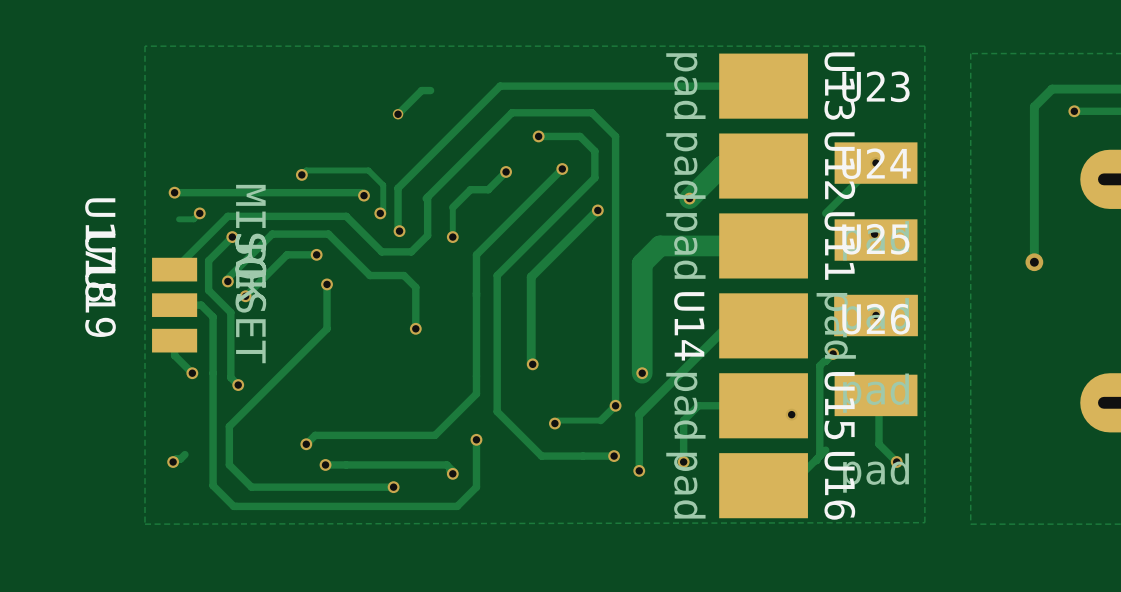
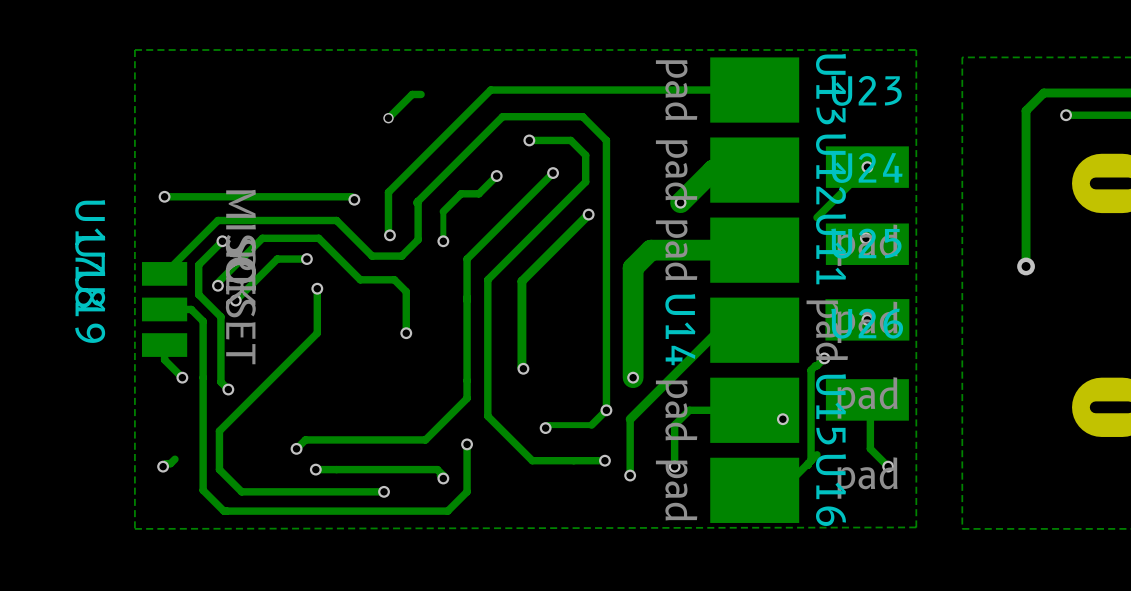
track: (301, 174) (306, 170) (368, 170) (383, 185) (383, 210) (380, 213) -> none
via: (301, 174) -> none
track: (199, 213) (193, 219) (179, 219) -> none
via: (199, 213) -> none
via: (380, 213) -> none

